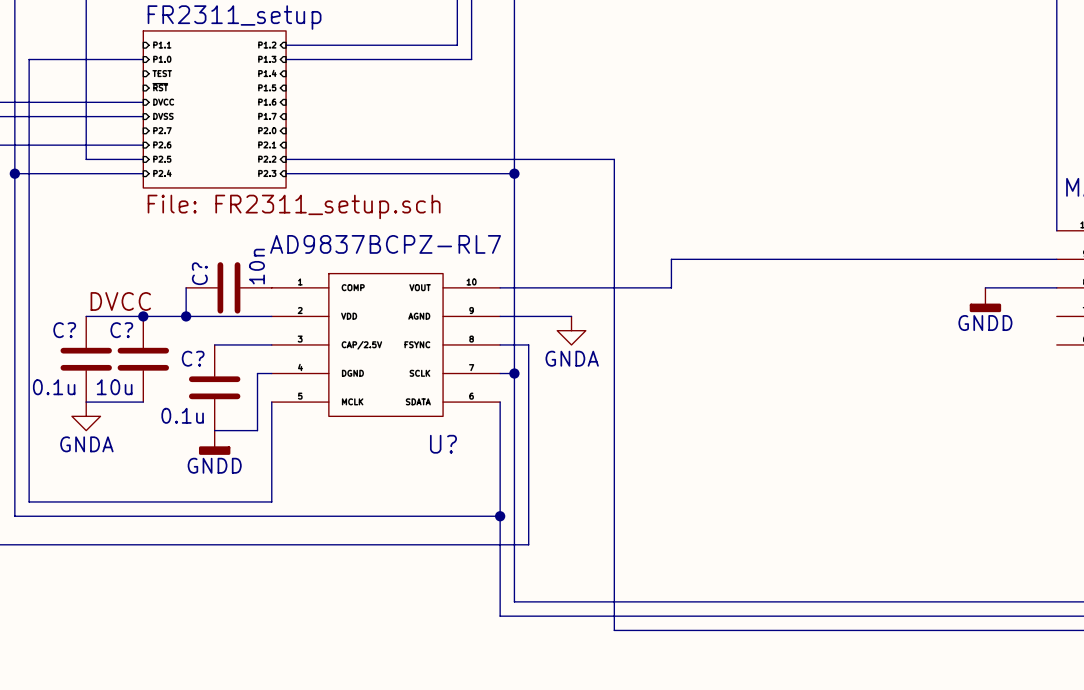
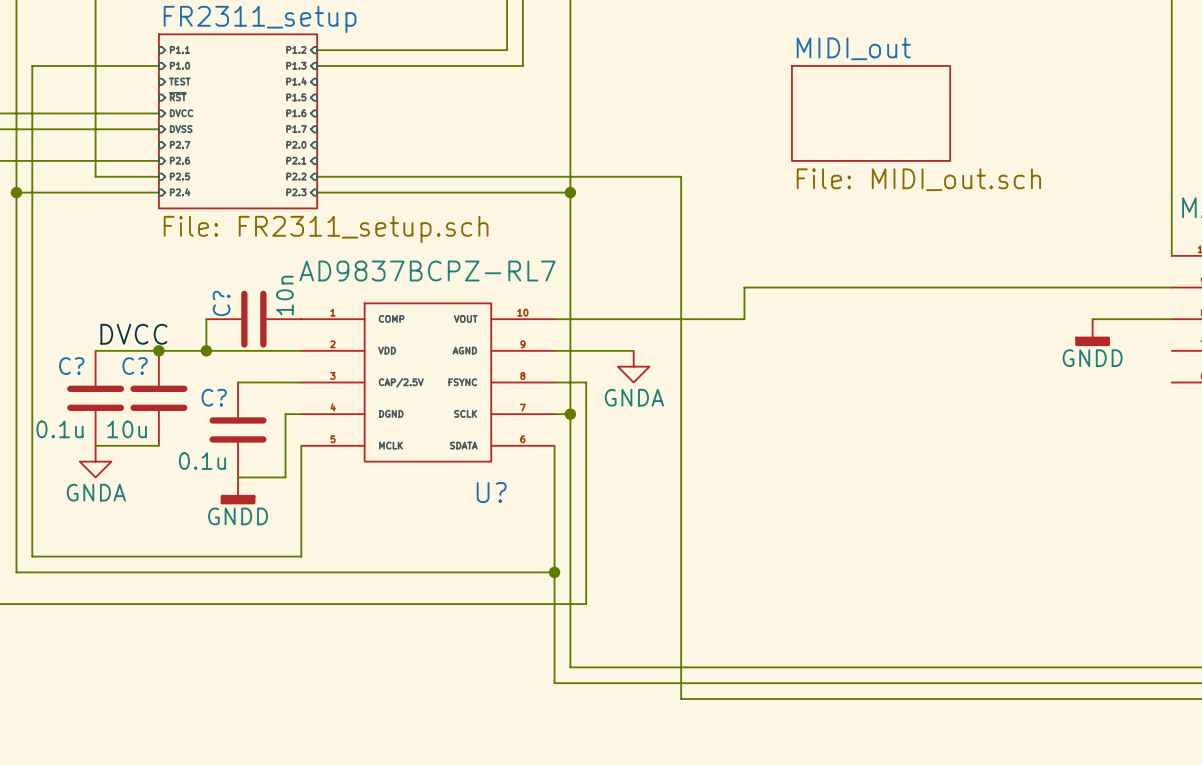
sheet MIDI_out: none -> File: MIDI_out.sch (871, 113)

